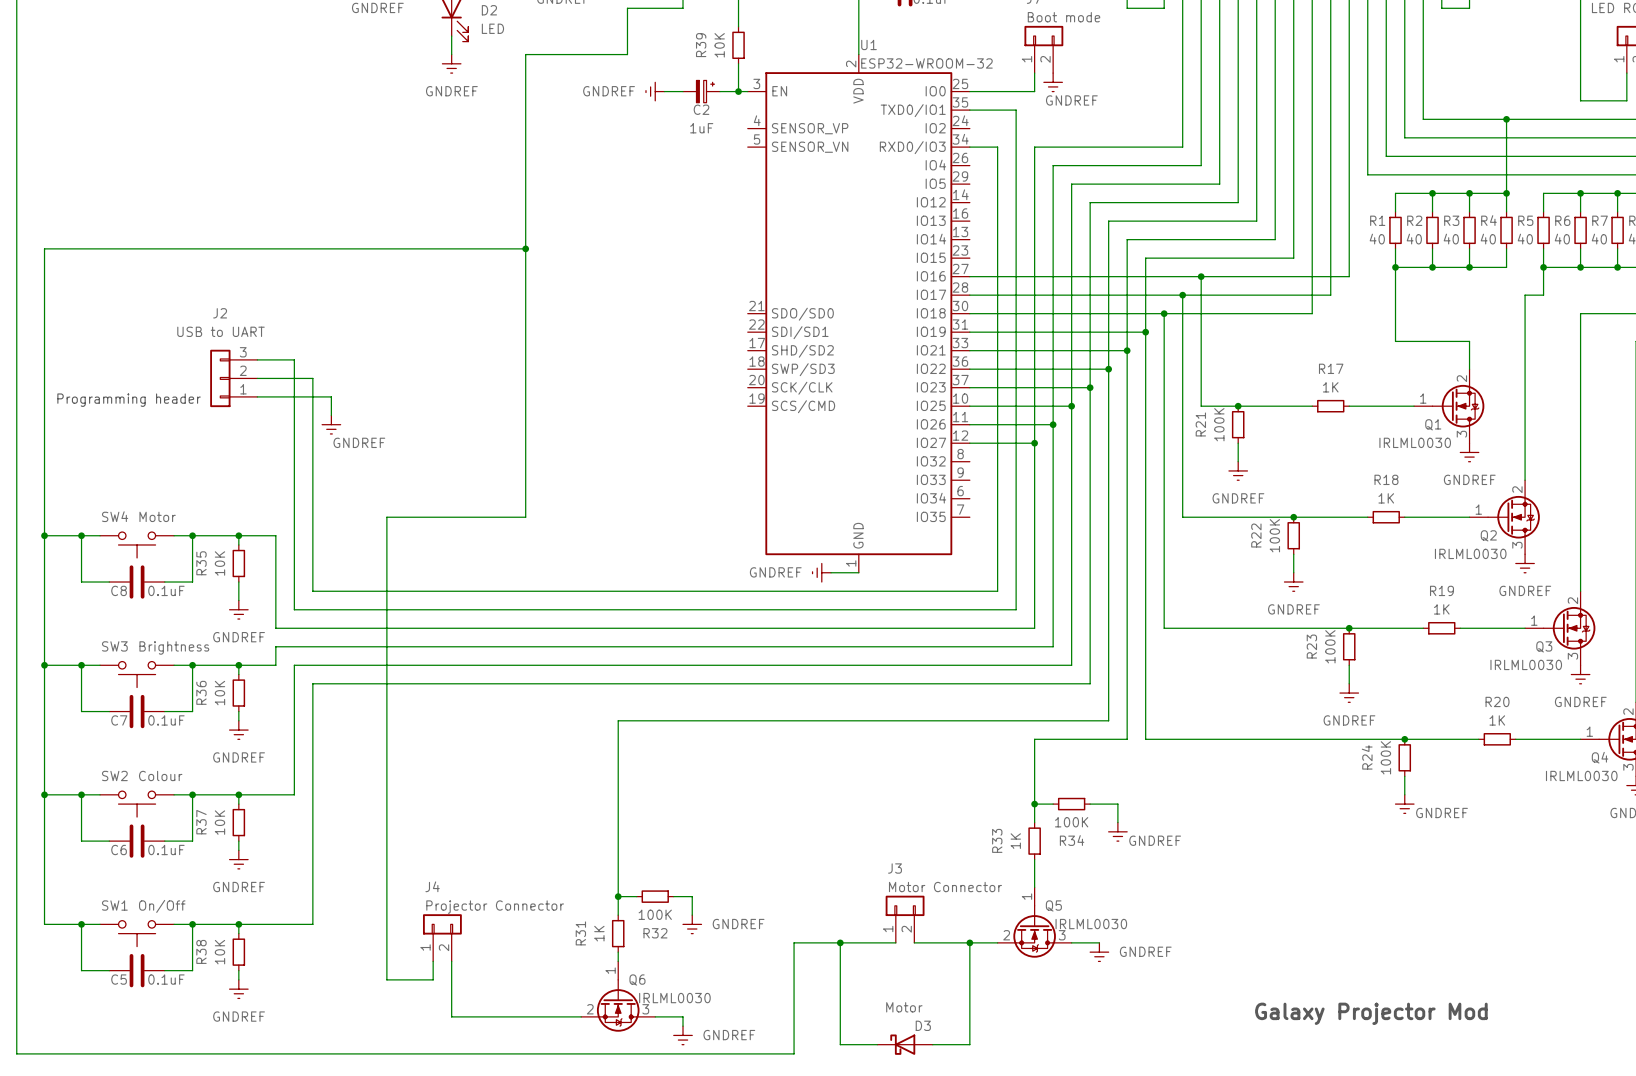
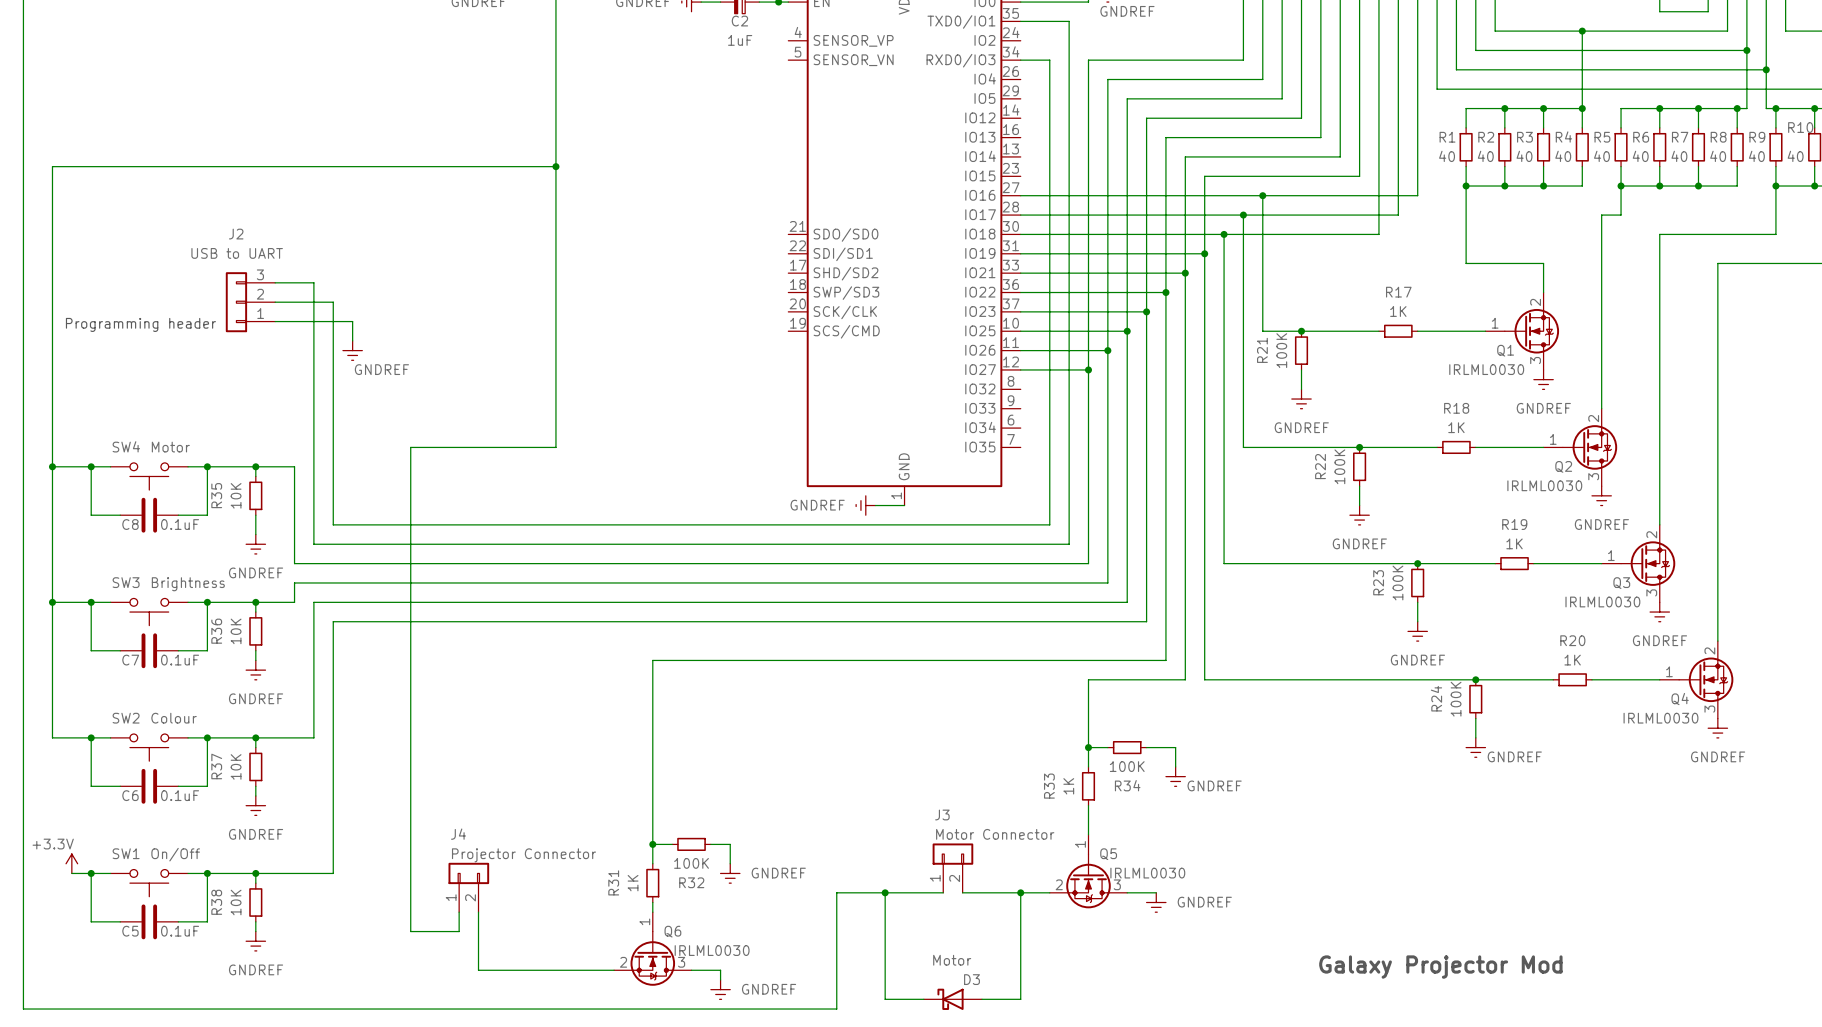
wire: (44, 794) (44, 924) (63, 924) -> none
junction: (44, 794) -> none
power symbol: none -> +3.3V (71, 863)

